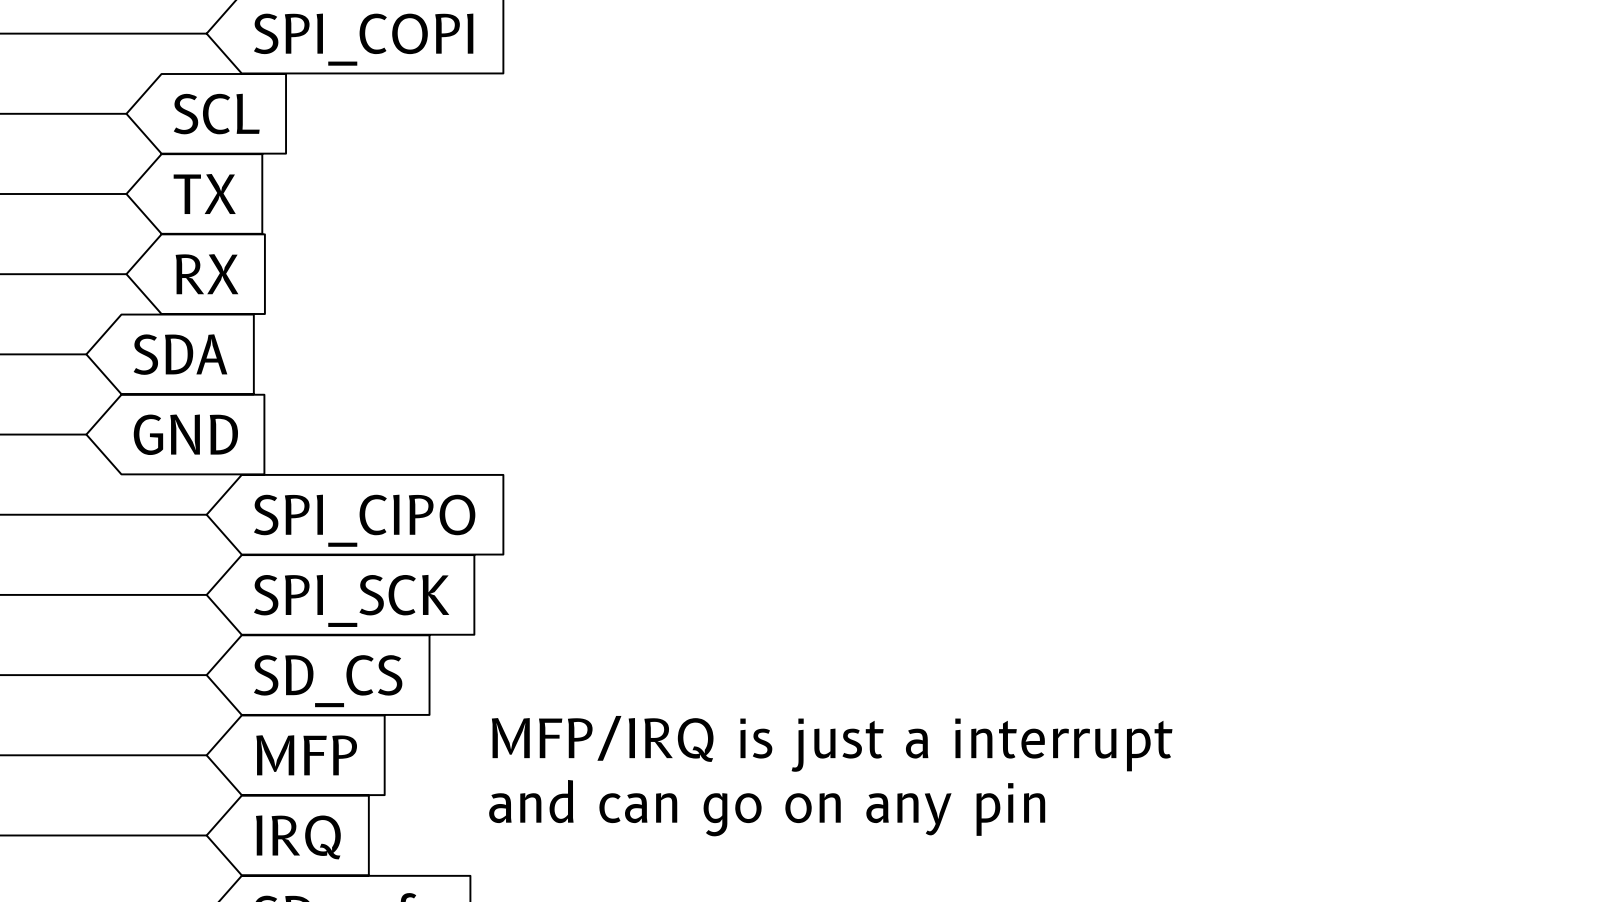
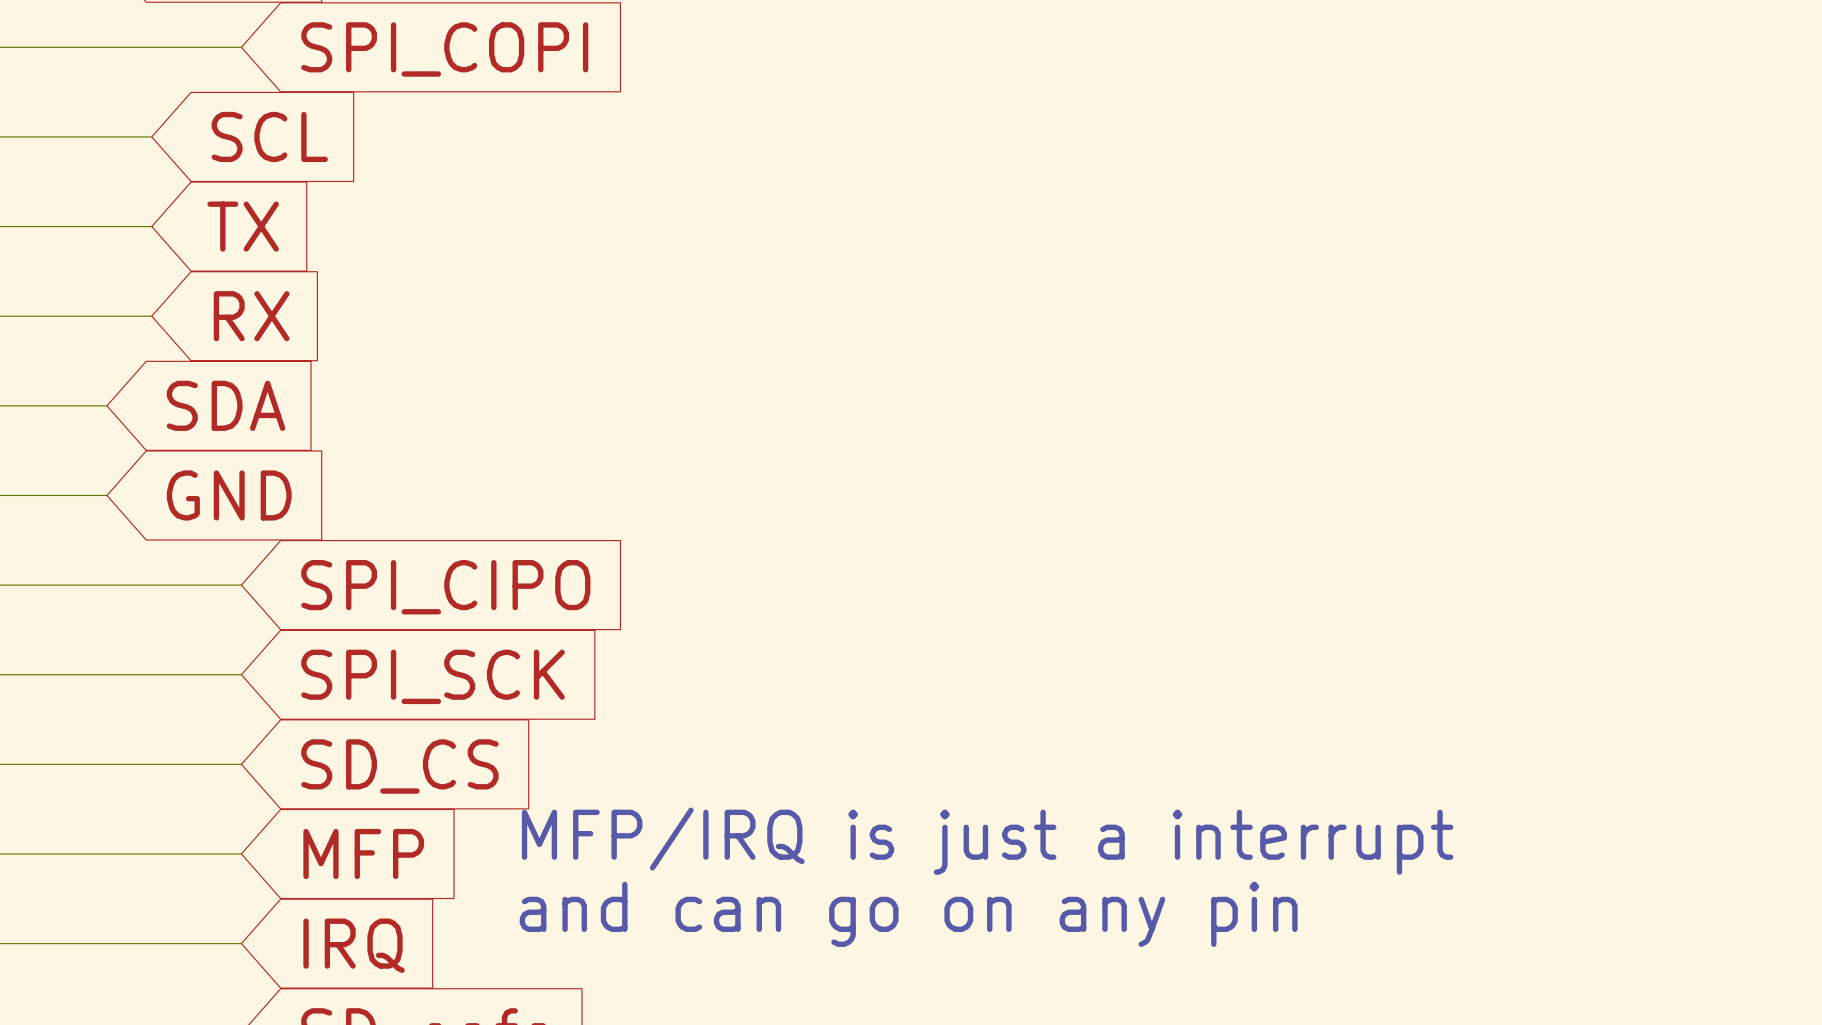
text position: MFP/IRQ is just a interrupt (832, 743) -> MFP/IRQ is just a interrupt (987, 841)
text position: and can go on any pin (767, 808) -> and can go on any pin (908, 914)

